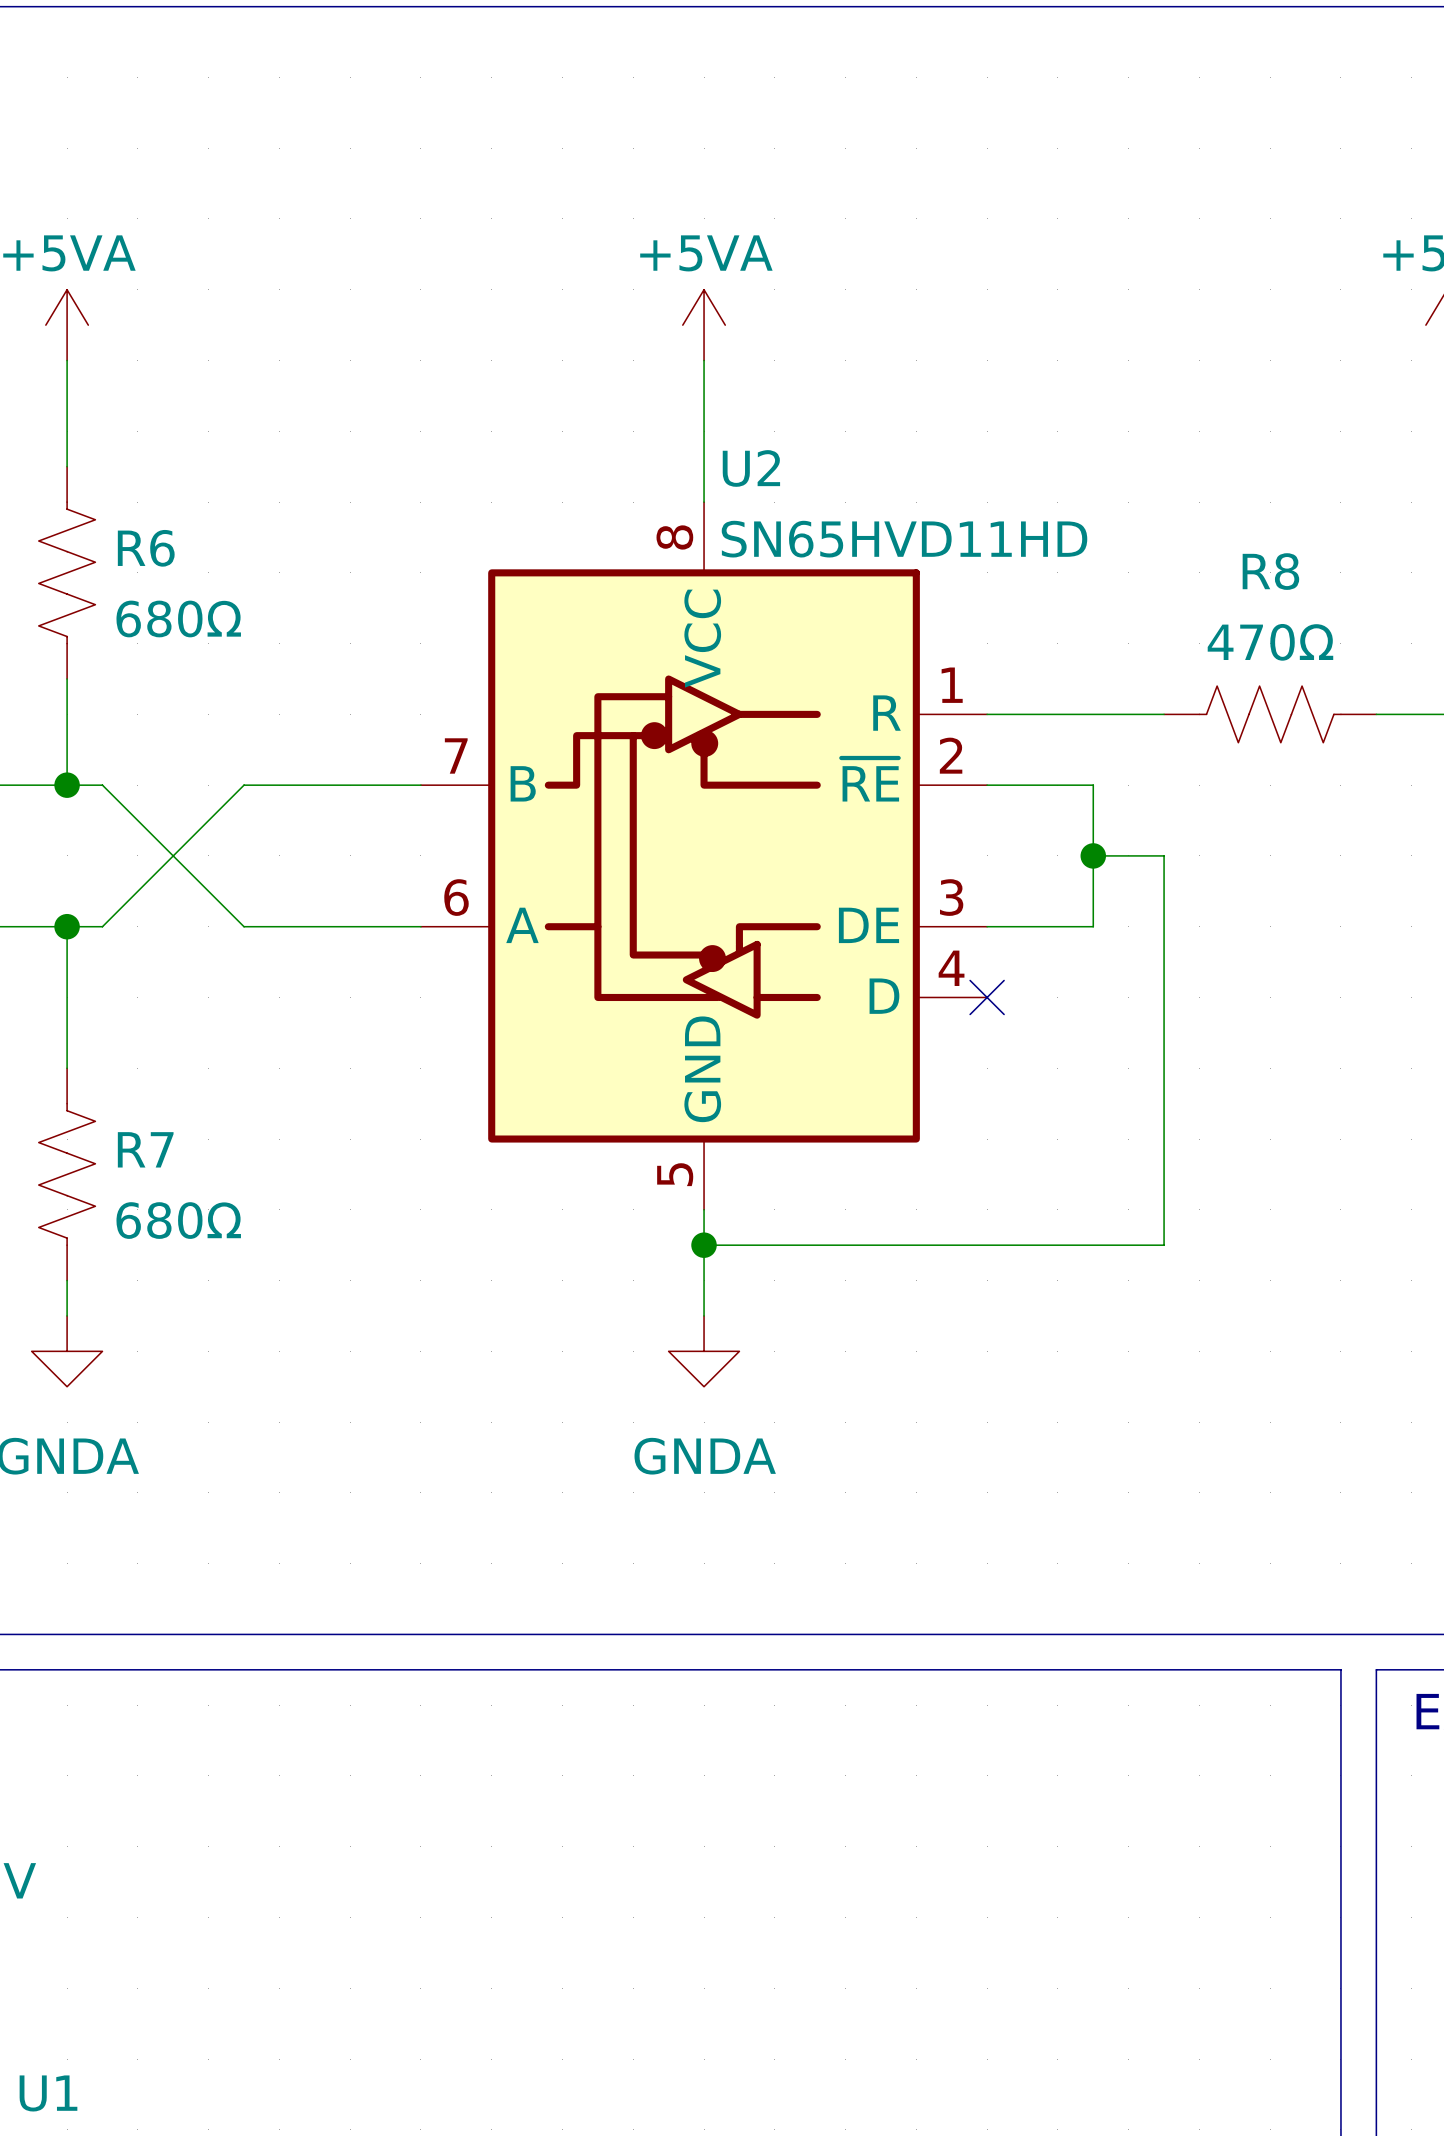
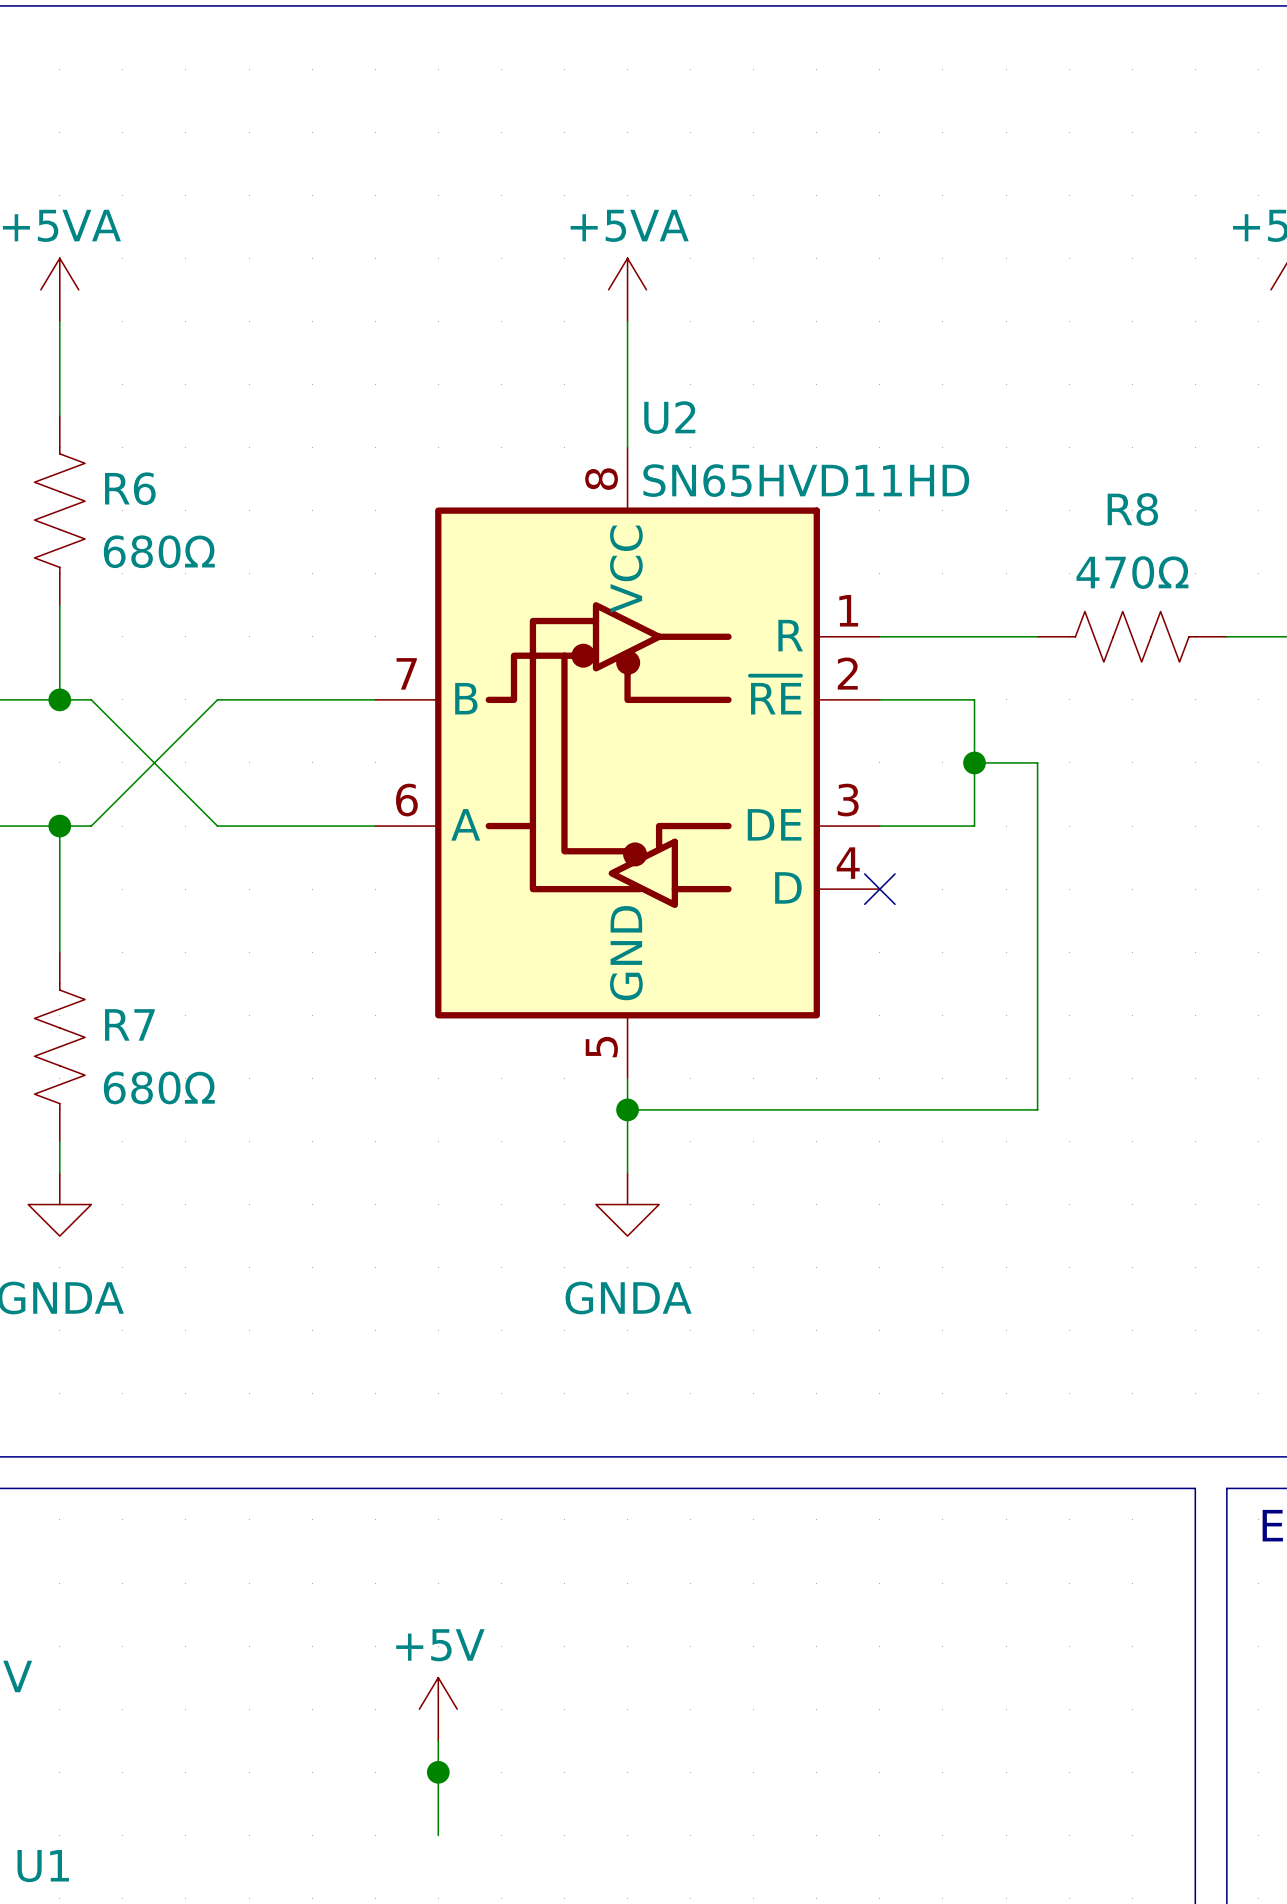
power symbol: none -> +5V (438, 1709)
wire: none -> (438, 1740) (438, 1835)
junction: none -> (438, 1772)

